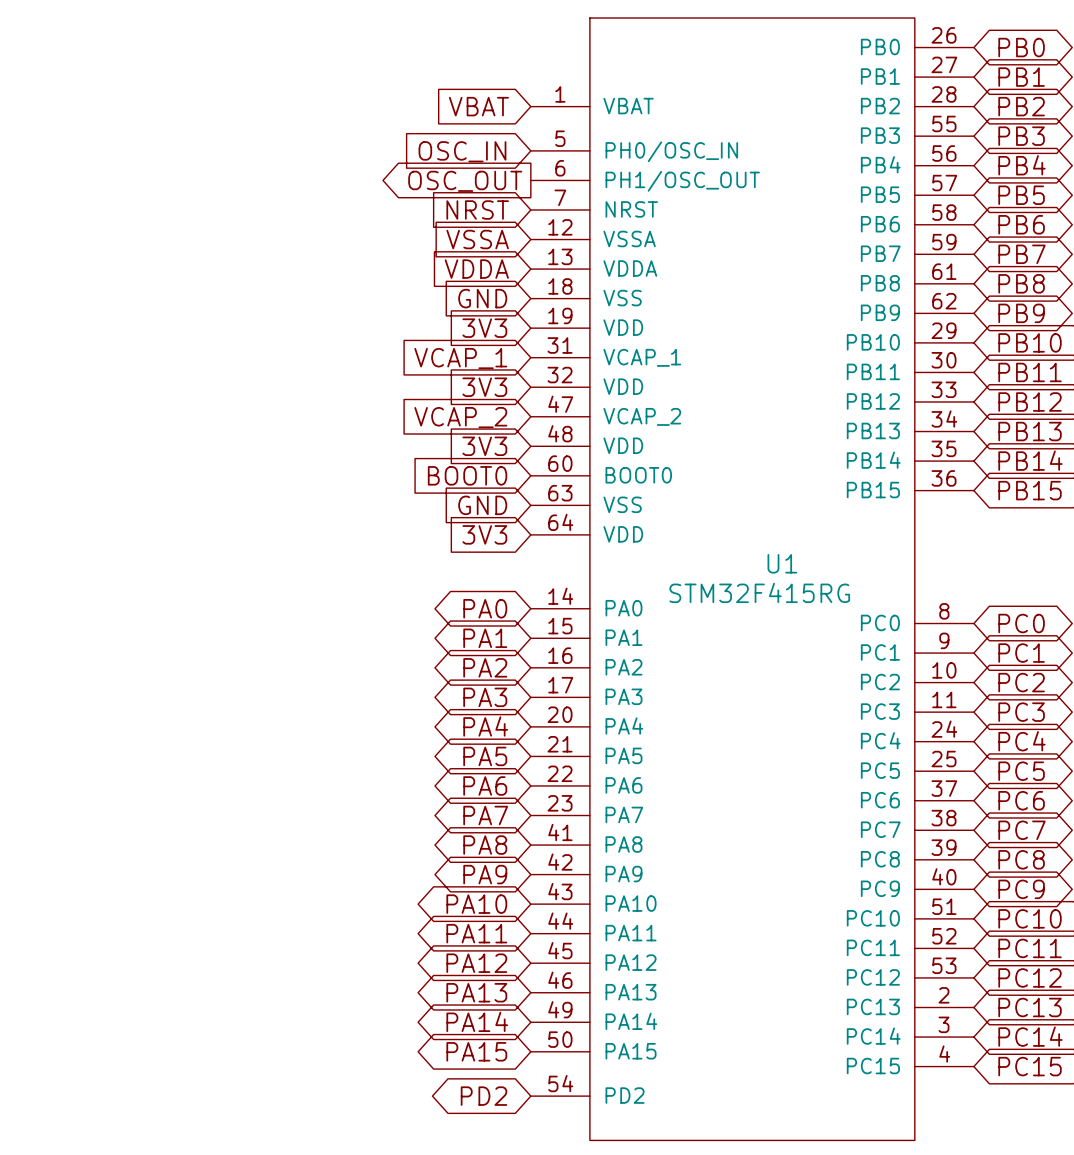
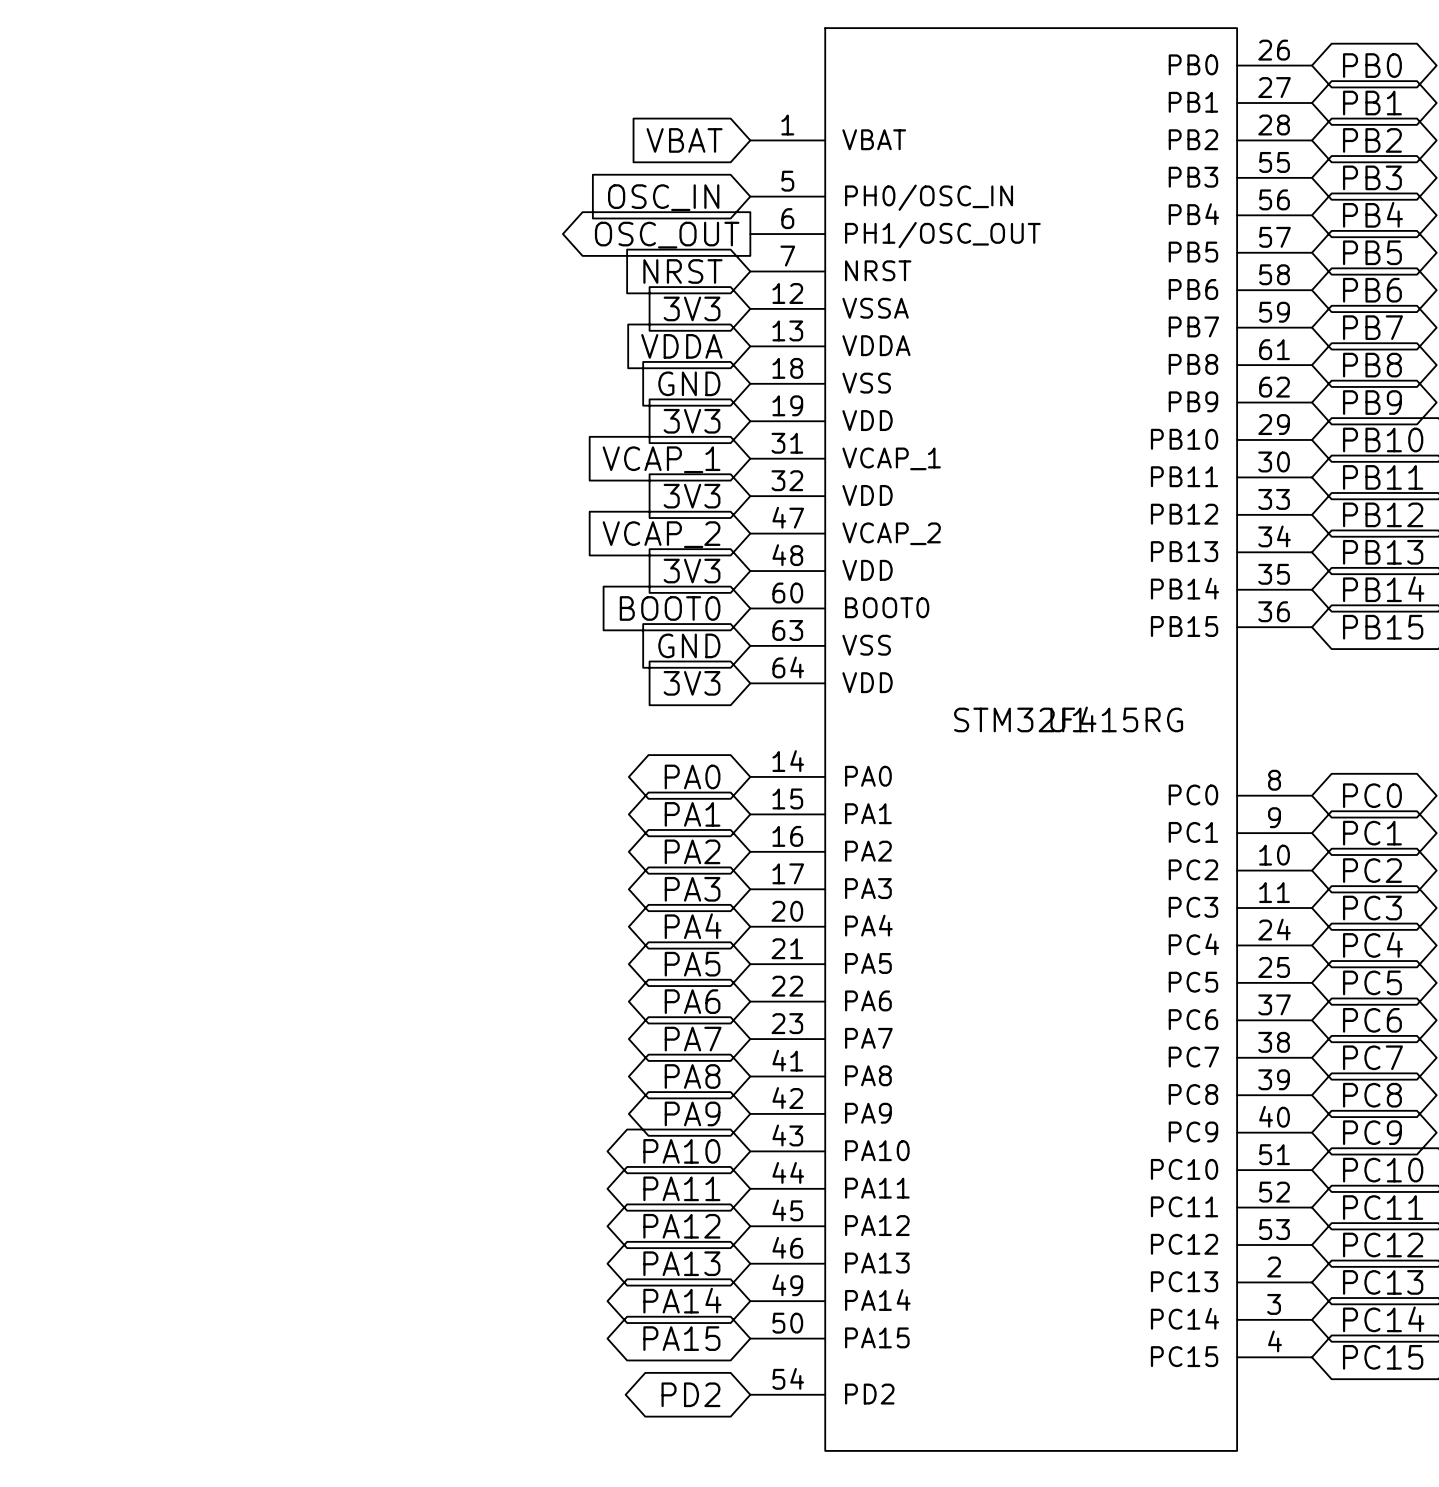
global label: VSSA (477, 239) -> 3V3 (692, 308)
U1 value position: STM32F415RG (759, 592) -> STM32F415RG (1068, 719)

